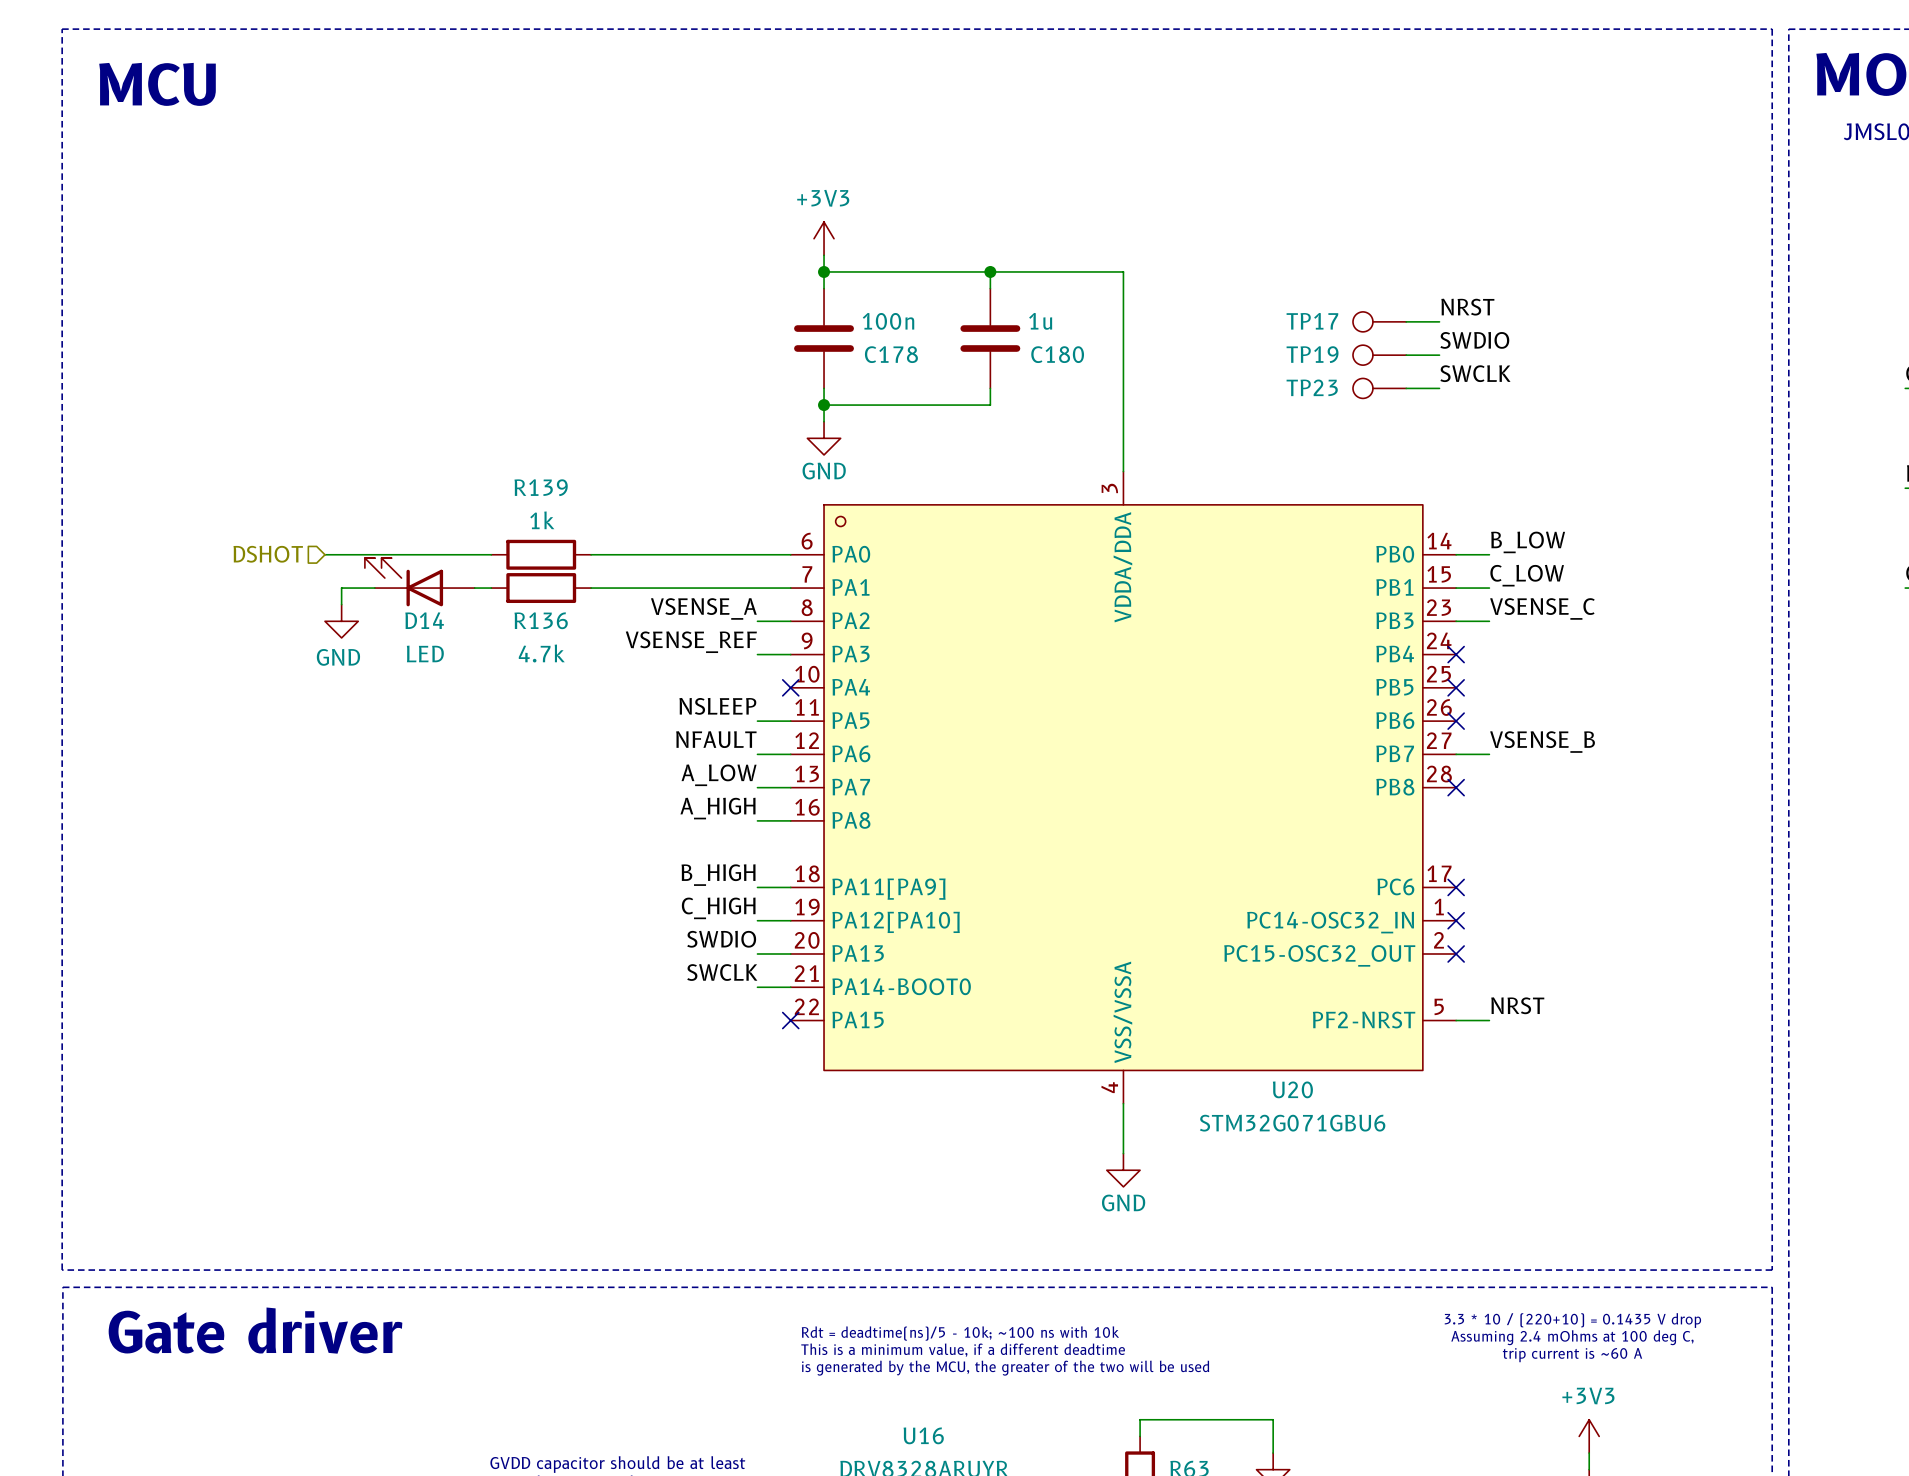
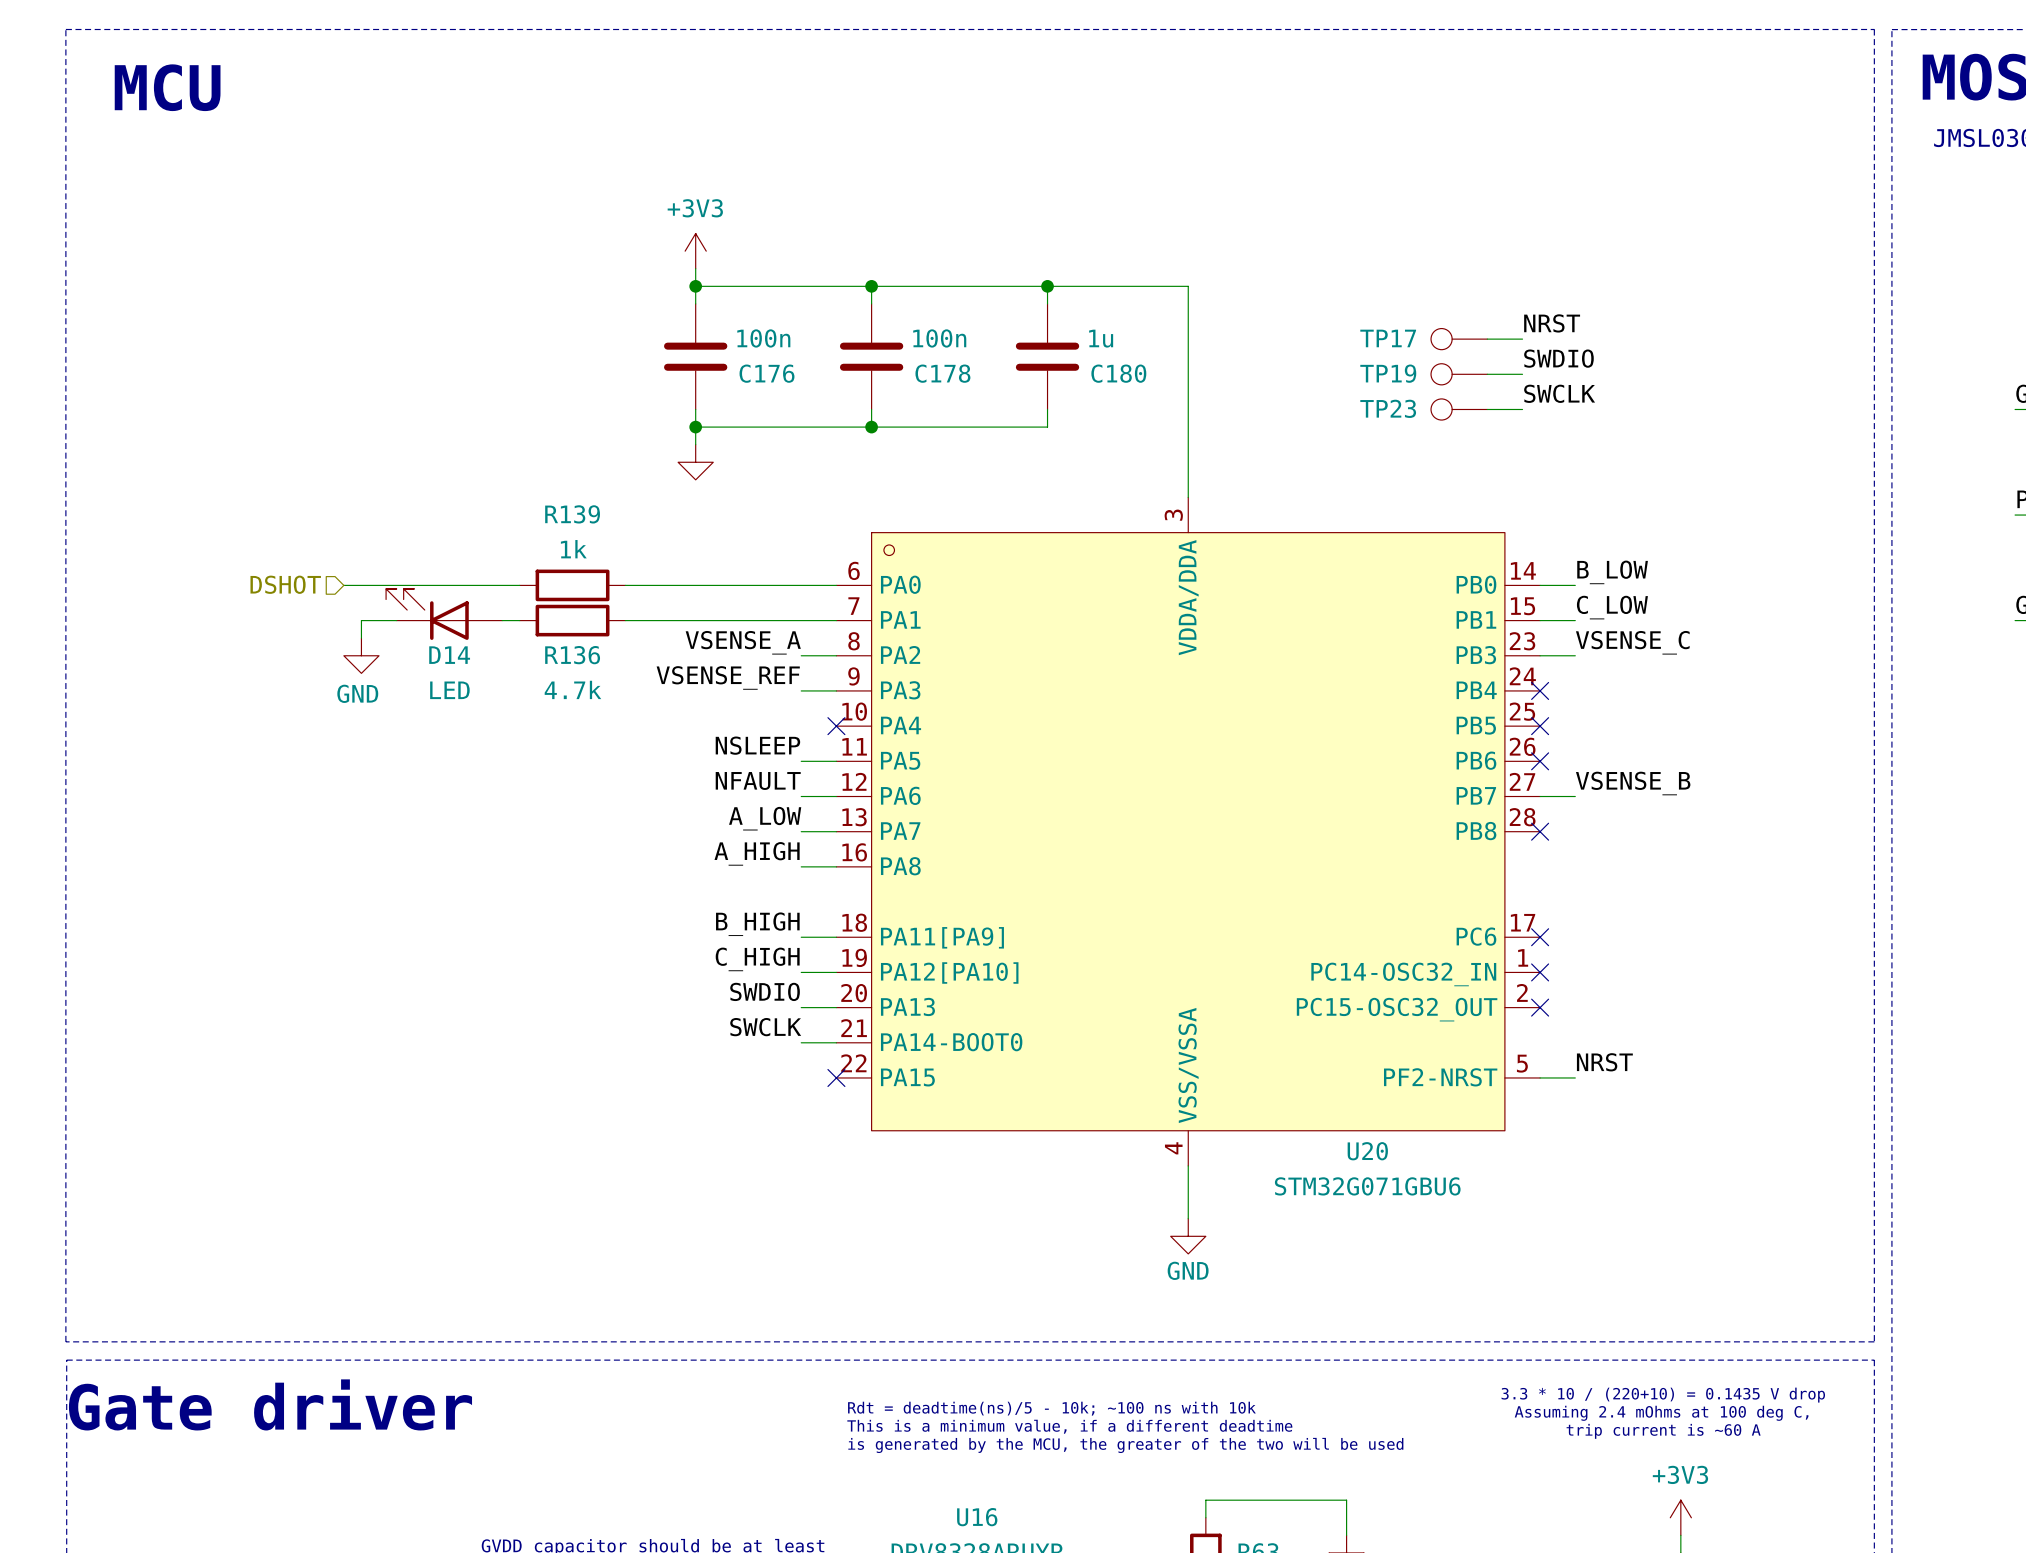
power symbol position: +3V3 (824, 238) -> +3V3 (695, 251)
wire: none -> (695, 268) (695, 303)
wire: (824, 255) (824, 271) -> (695, 286) (871, 286)
junction: none -> (695, 286)
C176: none -> 100n (695, 356)
wire: none -> (695, 409) (695, 444)
junction: none -> (695, 427)
wire: (824, 405) (824, 421) -> (871, 427) (695, 427)
power symbol: none -> (695, 462)
power symbol: GND (824, 438) -> none

